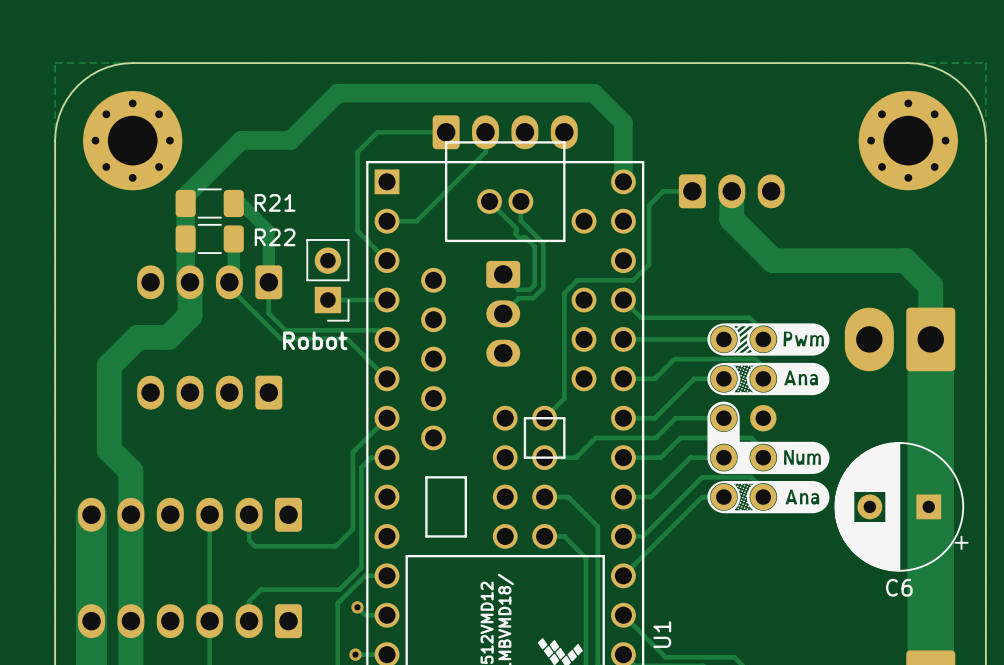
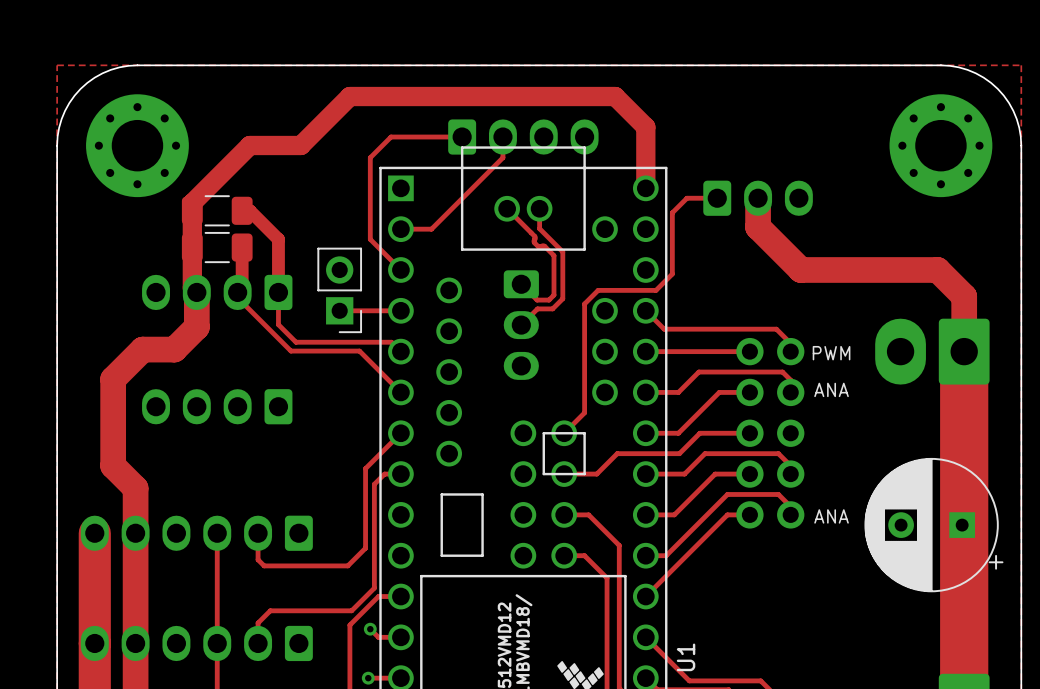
R21 name: R21 (275, 202) -> none
R22 name: R22 (275, 237) -> none
drawing: [707, 323, 830, 514] -> none
text: Robot (315, 340) -> none
text: none -> PWM (831, 353)
text: none -> ANA (831, 389)
text: none -> ANA (831, 516)
C6 name: C6 (899, 587) -> none

